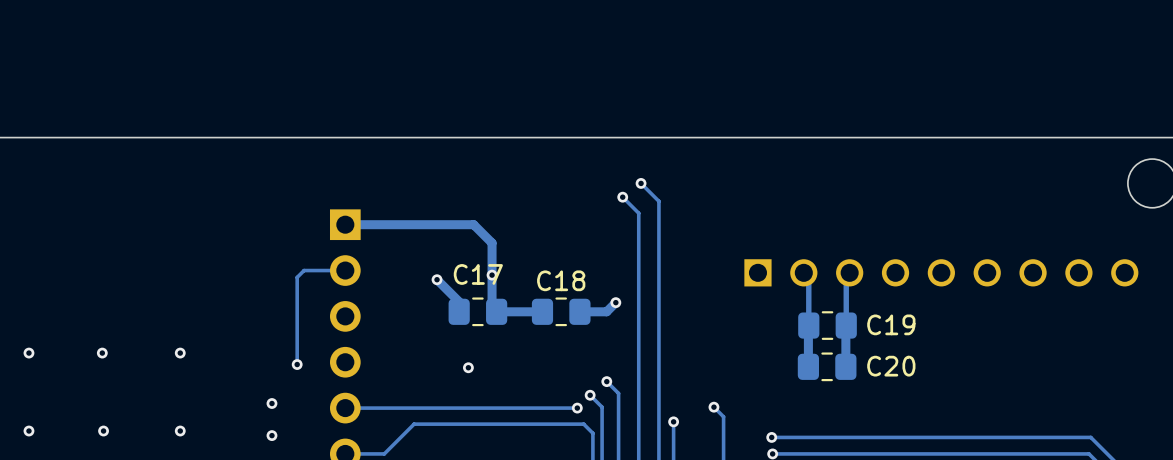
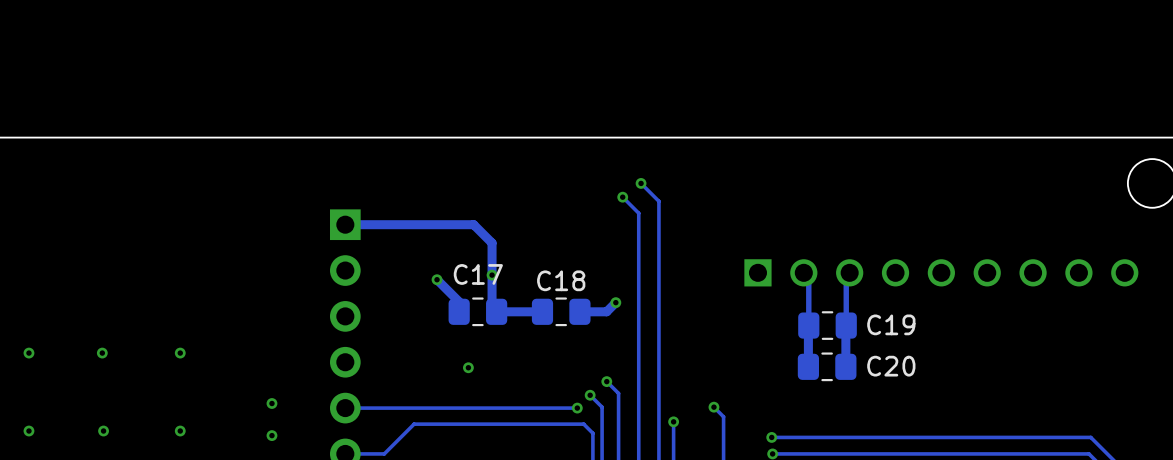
track: (345, 270) (304, 270) (297, 277) (297, 364) -> none
via: (297, 364) -> none

